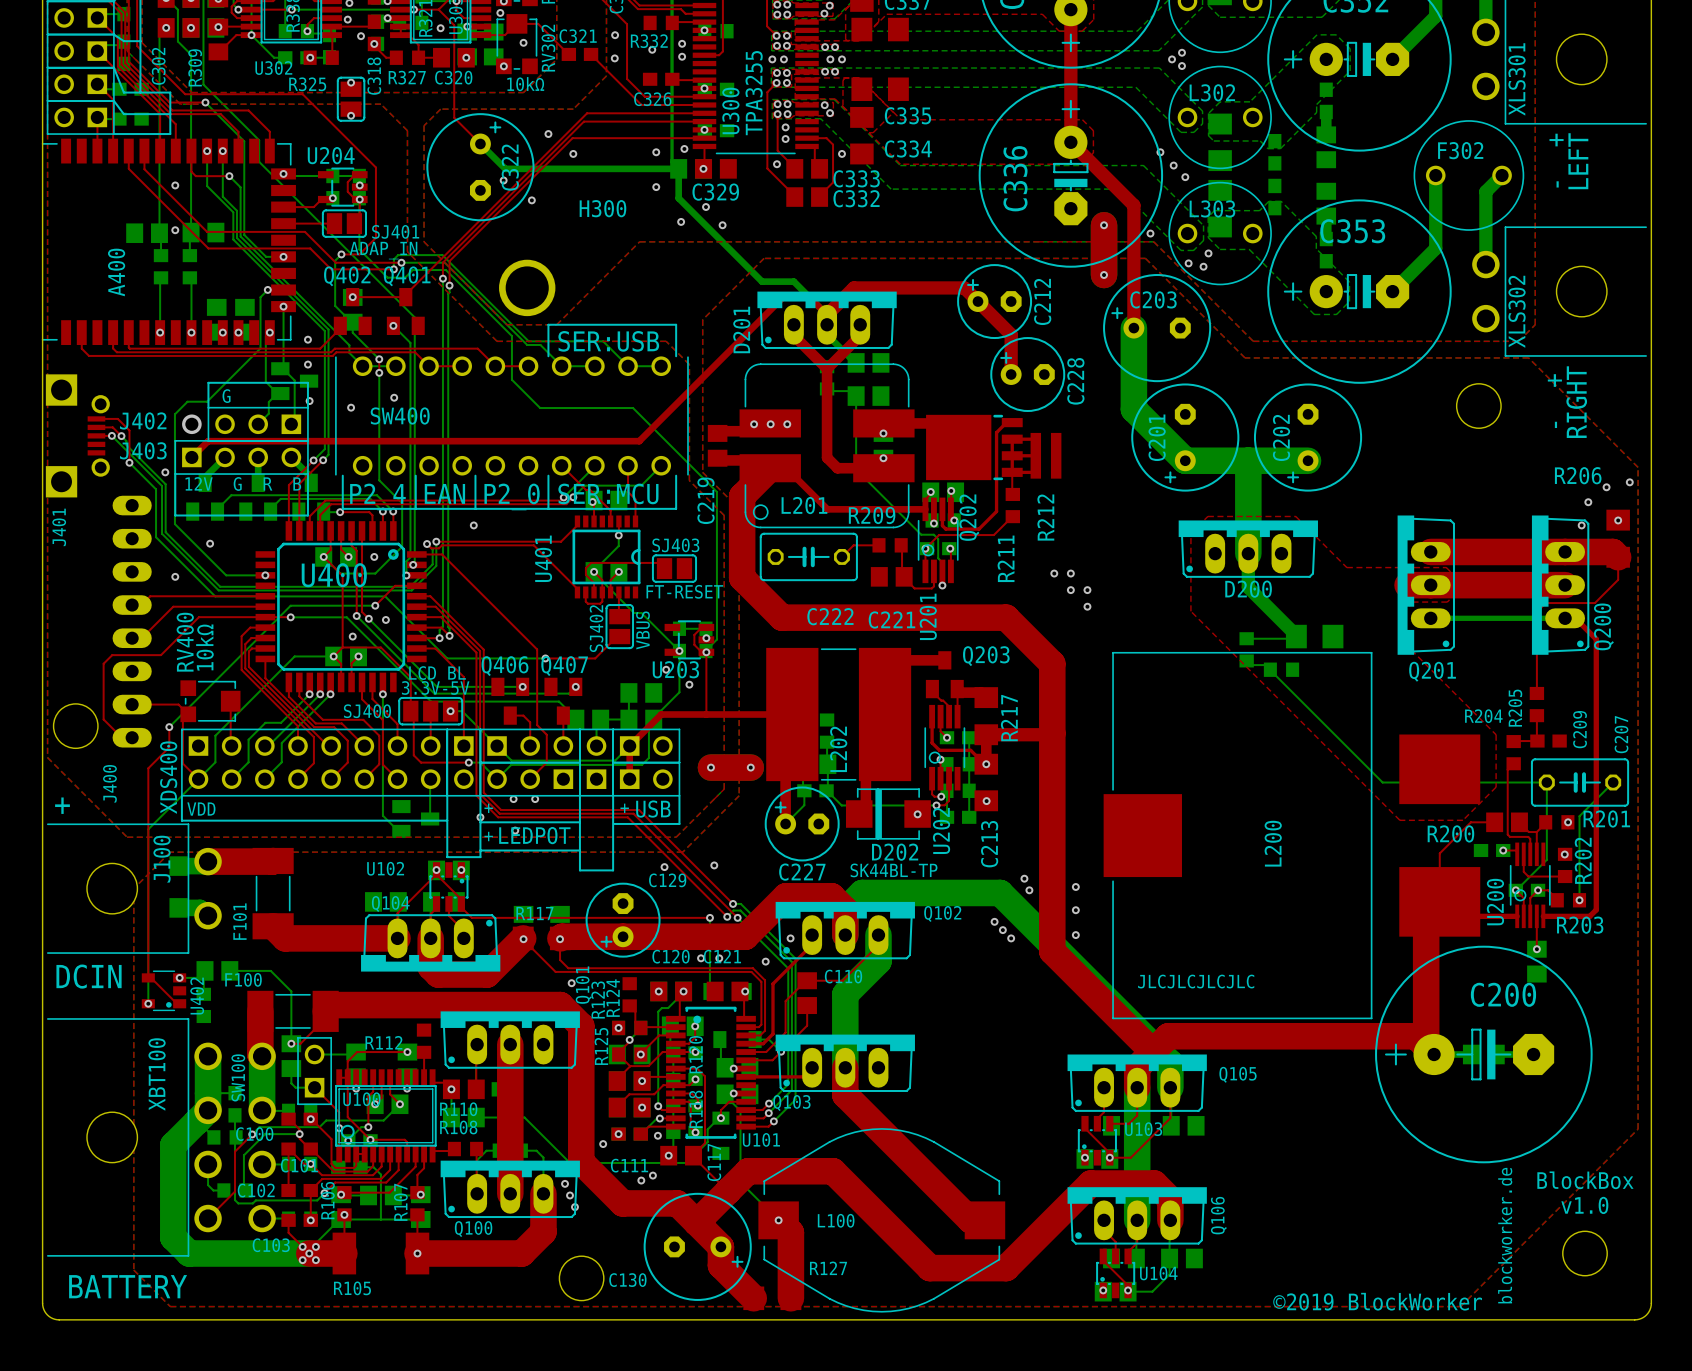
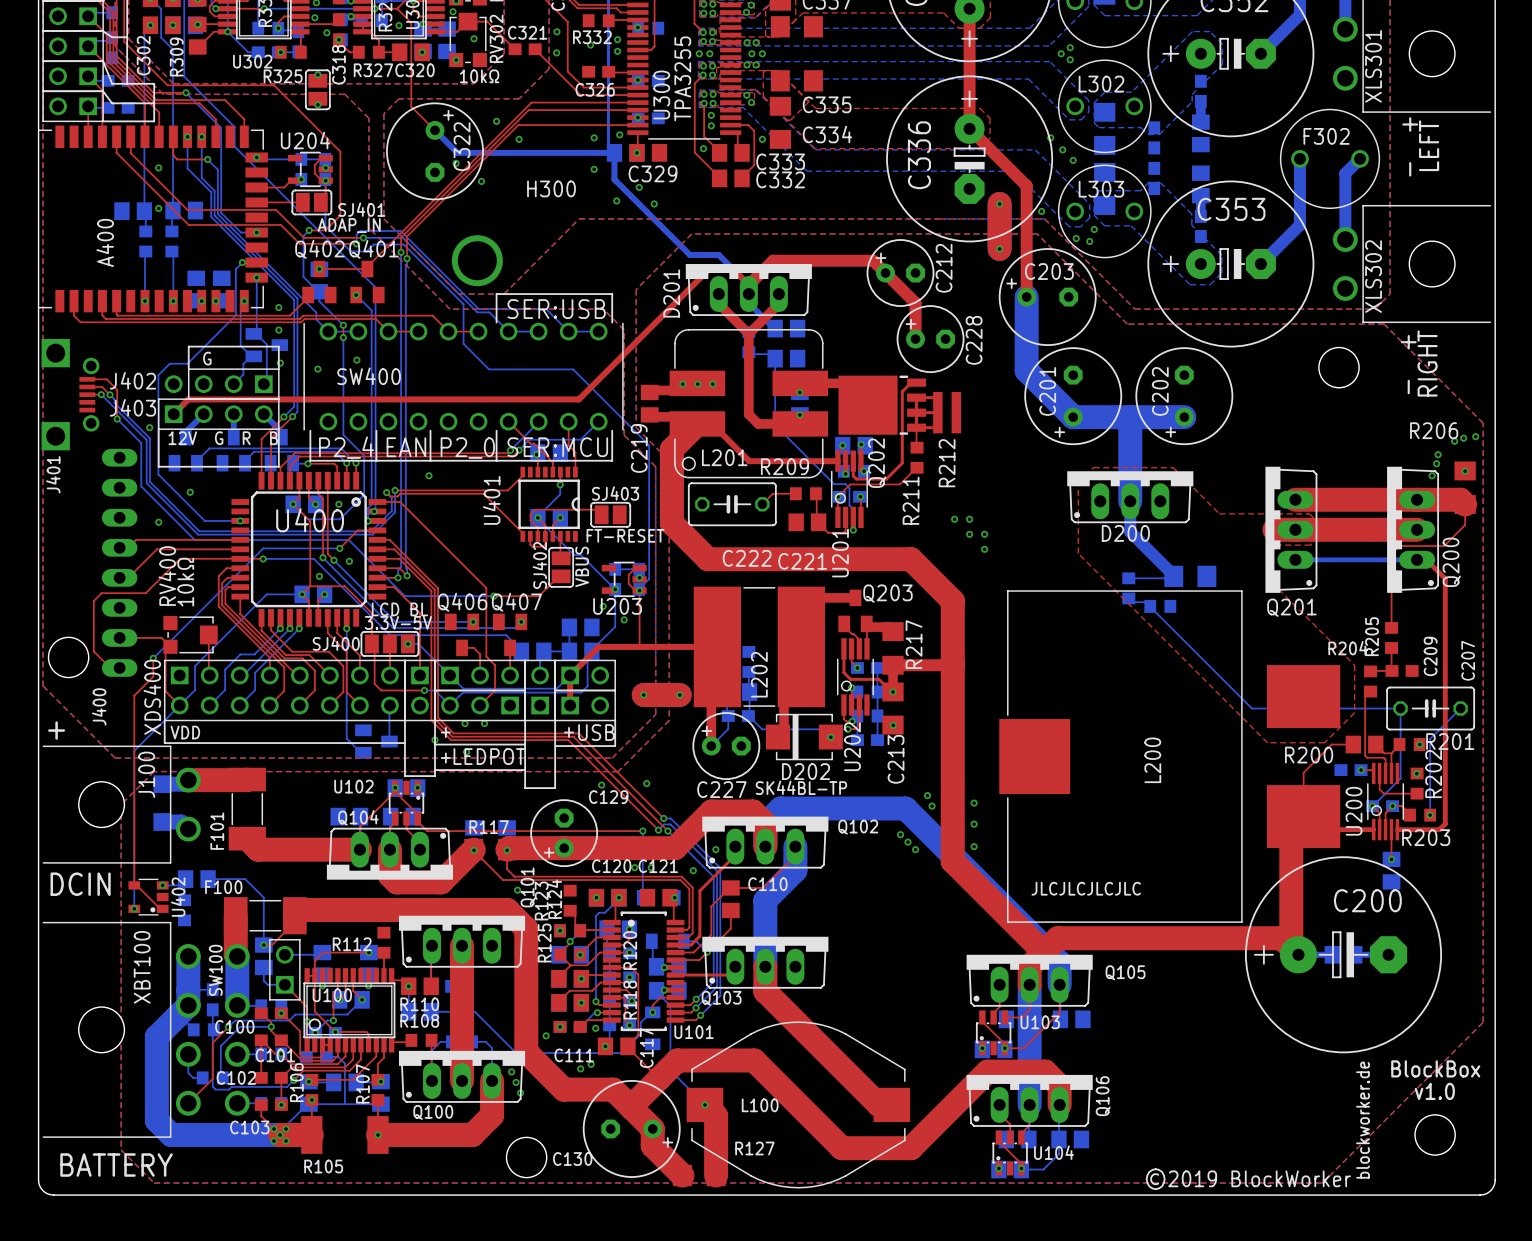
via: none -> (1463, 438)
via: none -> (1436, 463)

